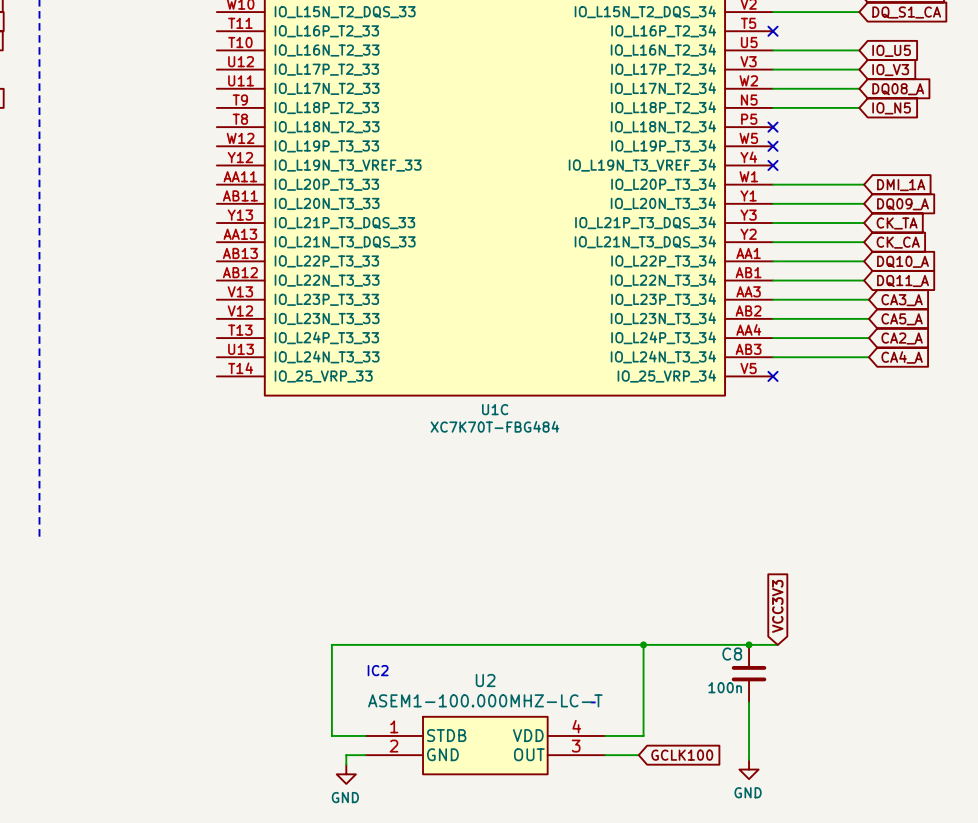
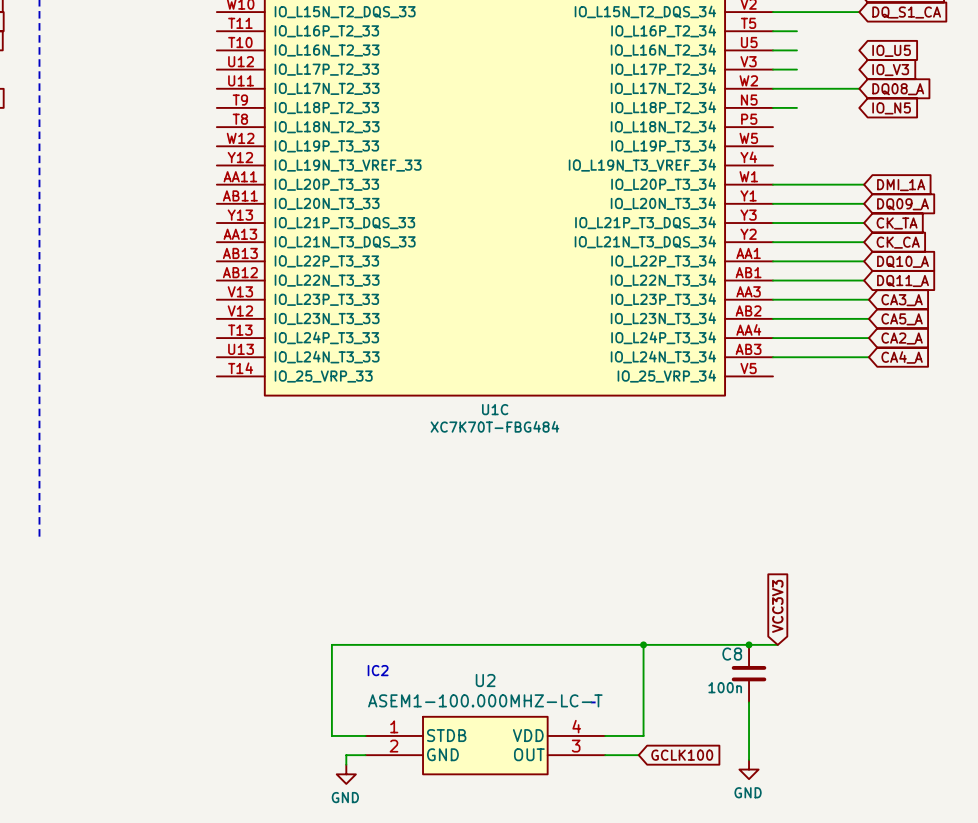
wire: none -> (772, 31) (796, 31)
no-connect mark: (772, 31) -> none
wire: (796, 50) (859, 50) -> none
wire: (796, 69) (859, 69) -> none
wire: (796, 107) (859, 107) -> none
no-connect mark: (772, 127) -> none
no-connect mark: (772, 146) -> none
no-connect mark: (772, 165) -> none
no-connect mark: (772, 376) -> none

